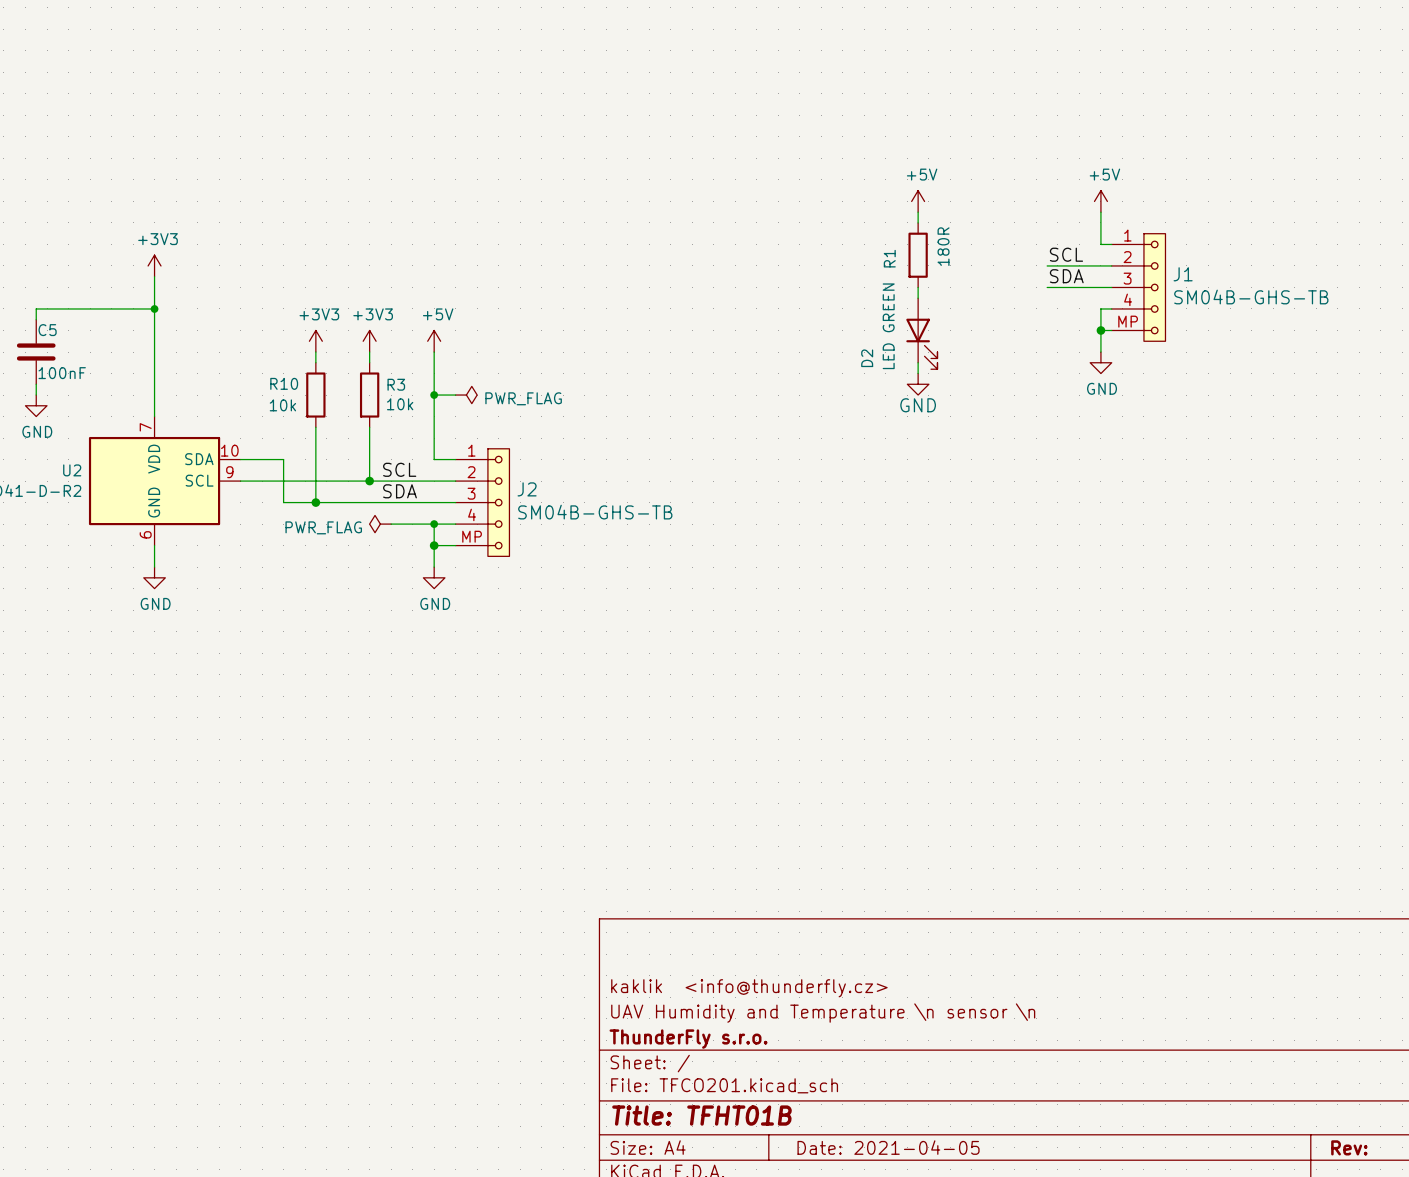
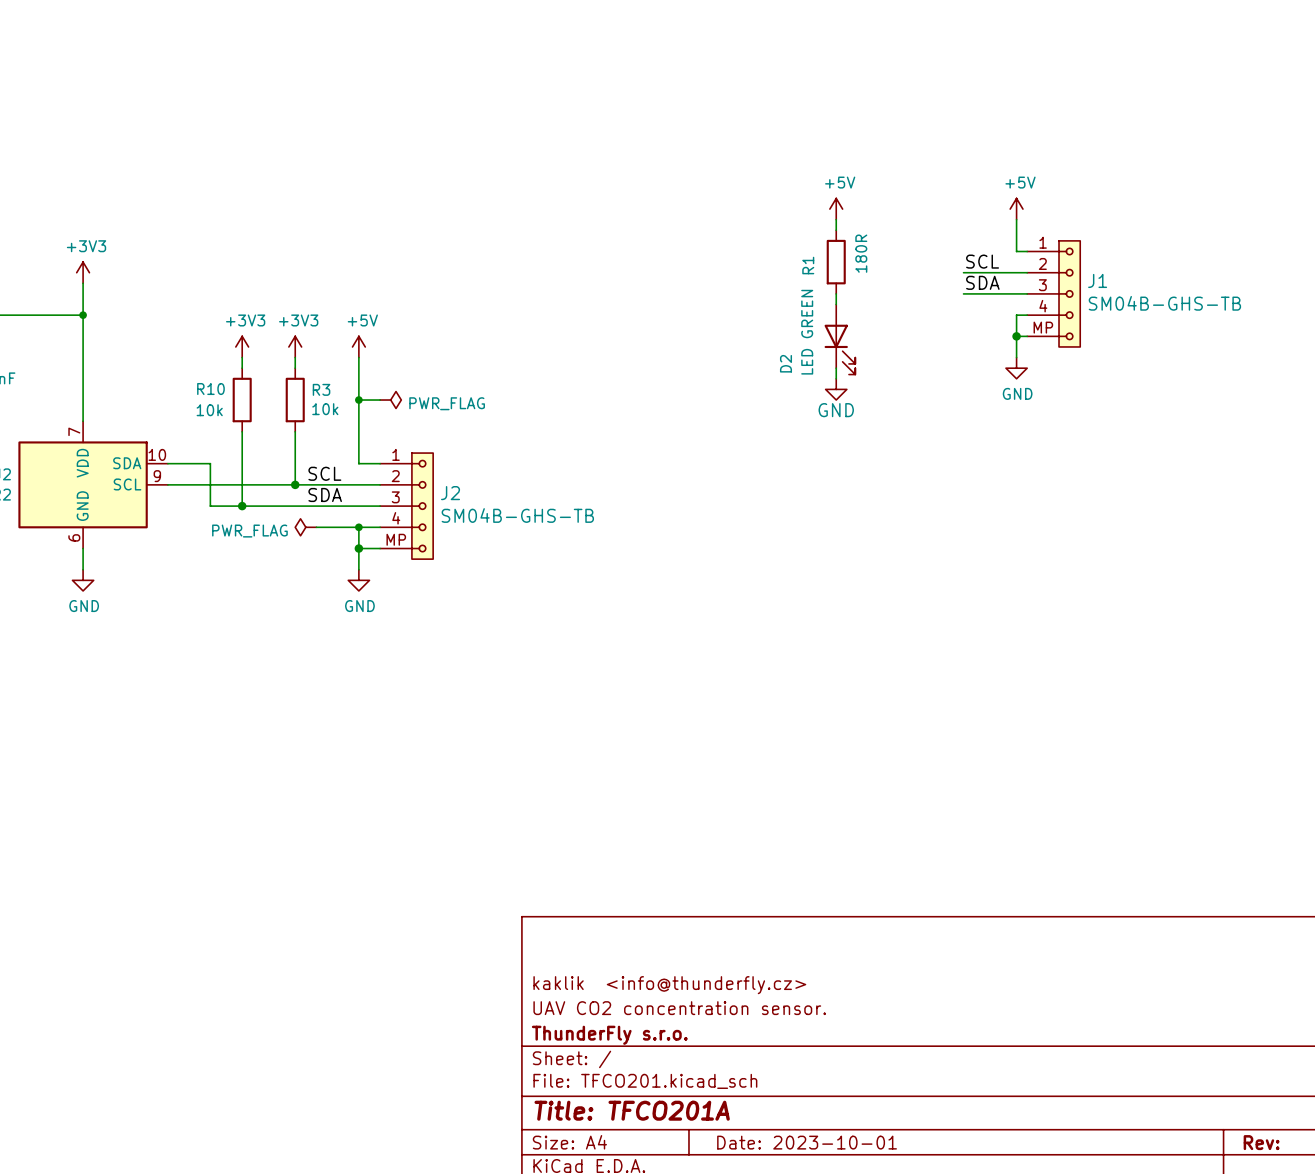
title block: UAV Humidity and Temperature \n sensor \n (823, 1013) -> UAV CO2 concentration sensor. (679, 1008)
title block: Title: TFHT01B (702, 1115) -> Title: TFCO201A (632, 1110)
title block: Date: 2021-04-05 (888, 1147) -> Date: 2023-10-01 (807, 1142)

